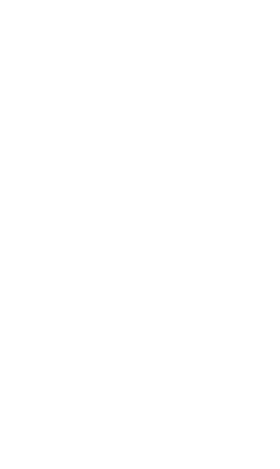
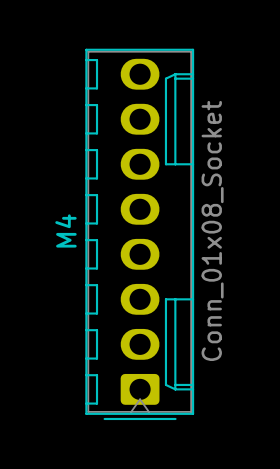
M4: none -> Conn_01x08_Socket (139, 234)

